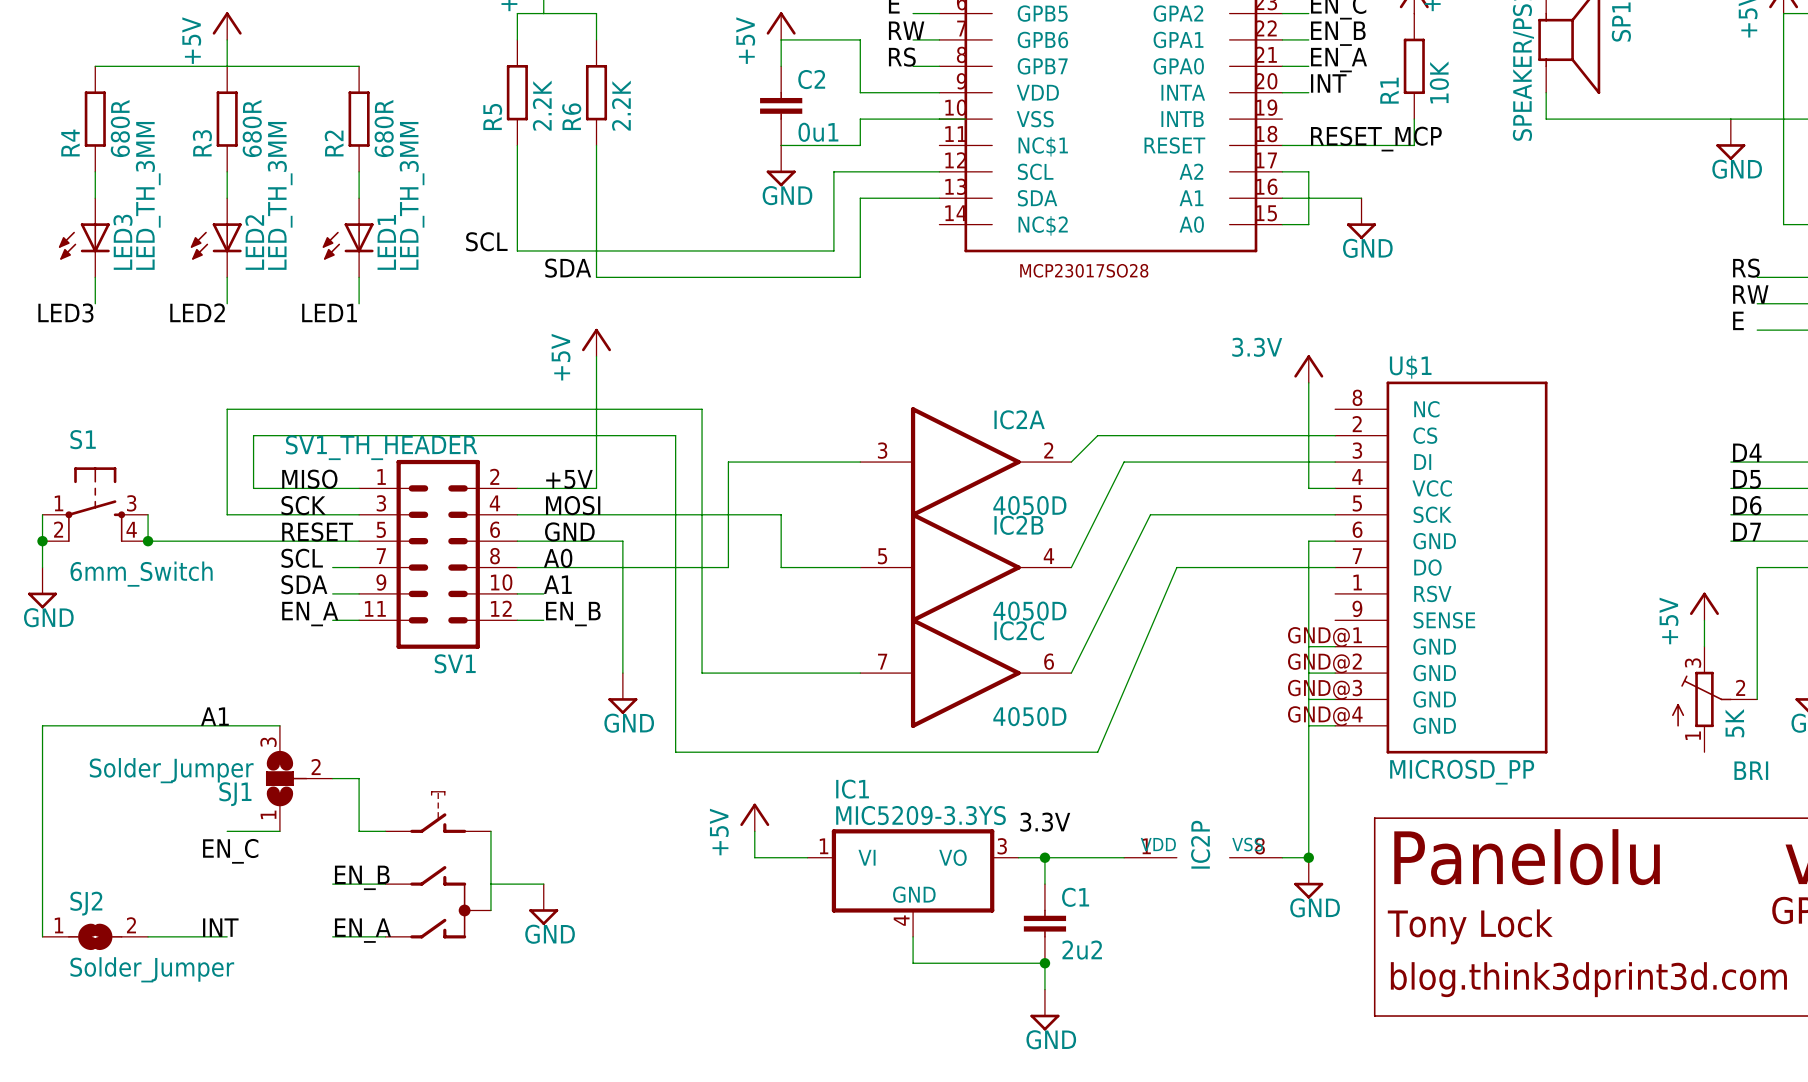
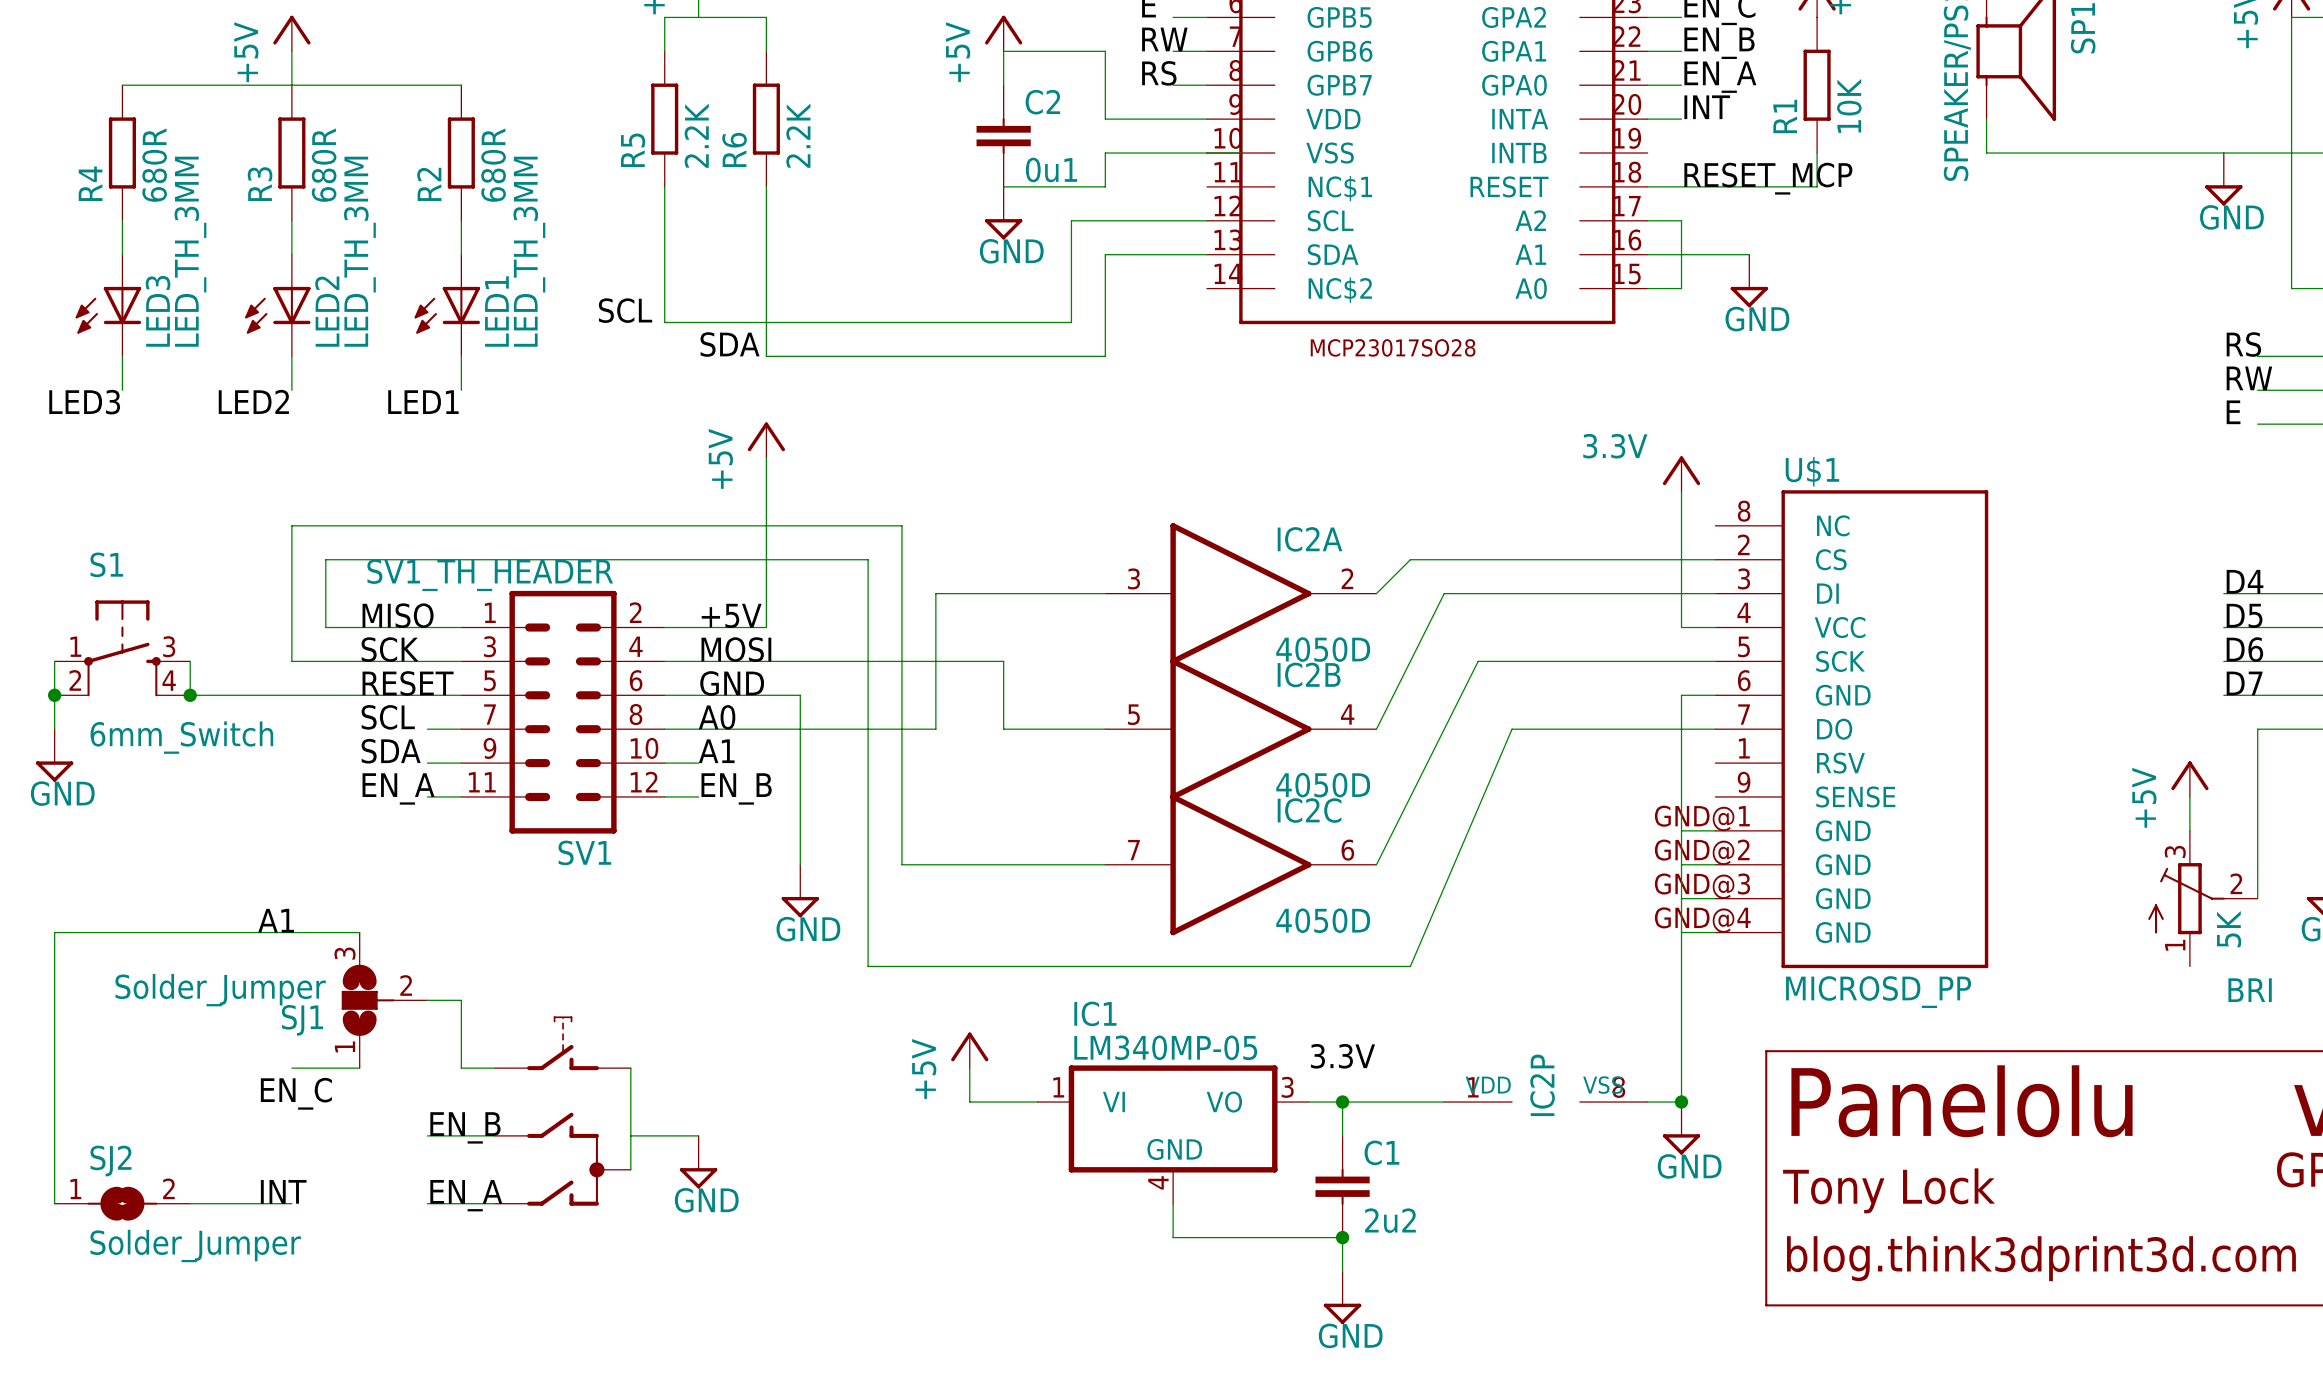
IC1 value: MIC5209-3.3YS (921, 815) -> LM340MP-05 (1165, 1047)

